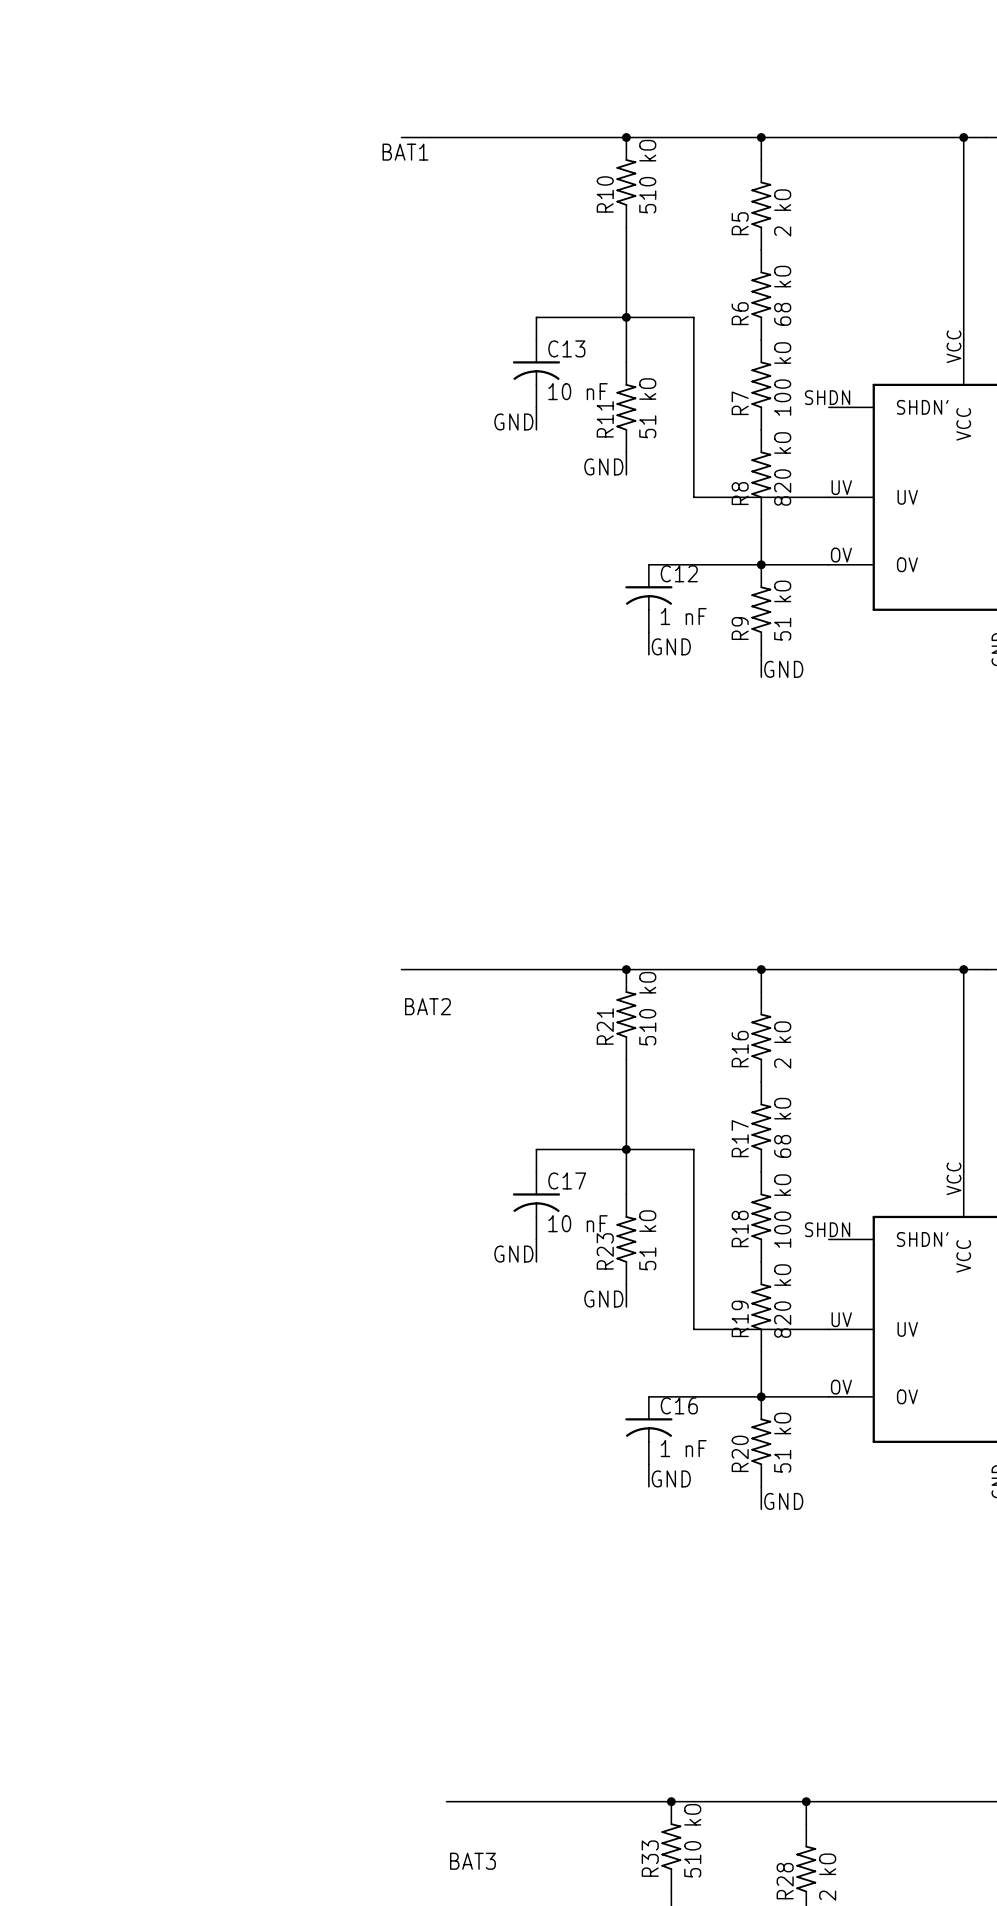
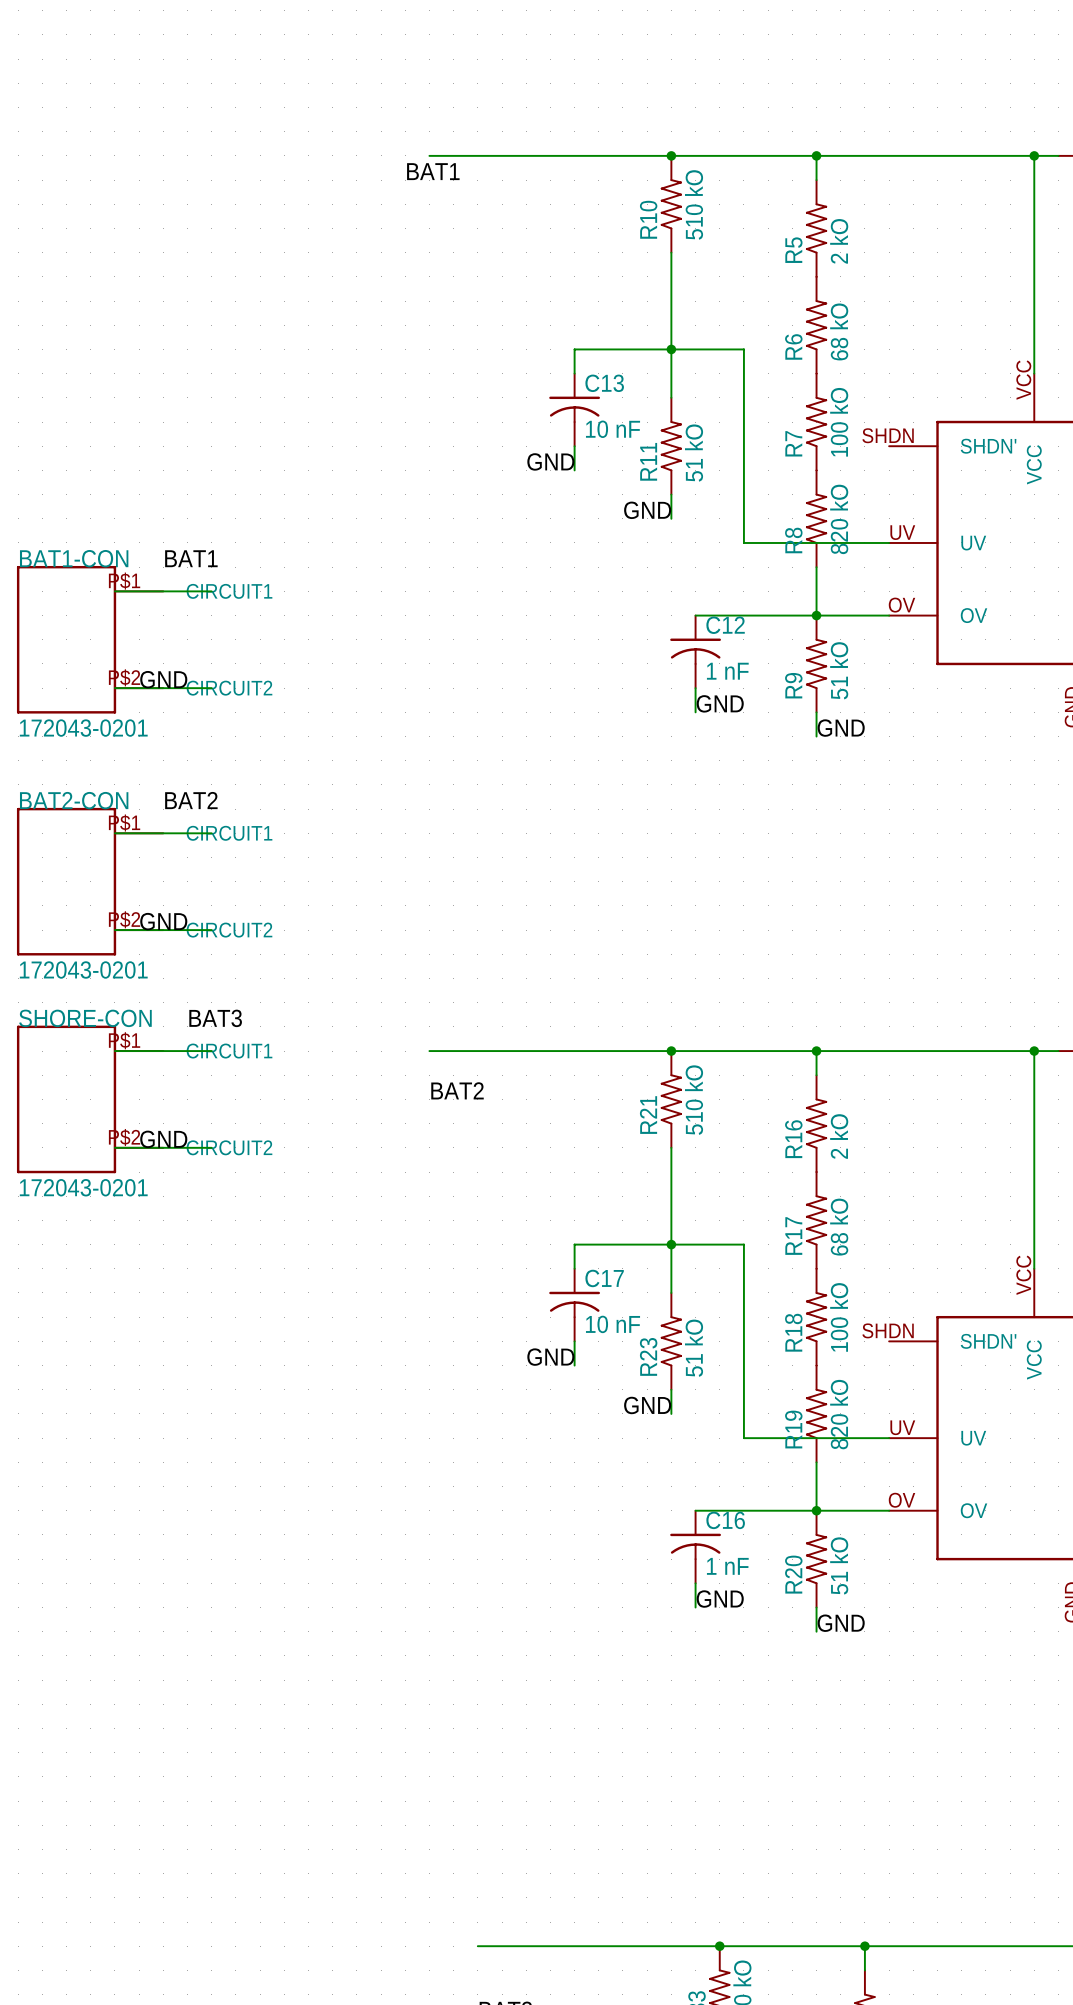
label: none -> BAT1 (191, 558)
wire: none -> (114, 591) (211, 591)
BAT1-CON: none -> 172043-0201 (90, 639)
label: none -> GND (163, 679)
wire: none -> (114, 688) (211, 688)
label: none -> BAT2 (191, 800)
wire: none -> (114, 833) (211, 833)
BAT2-CON: none -> 172043-0201 (90, 881)
label: none -> GND (163, 921)
wire: none -> (114, 930) (211, 930)
label: none -> BAT3 (215, 1018)
wire: none -> (114, 1051) (211, 1051)
SHORE-CON: none -> 172043-0201 (90, 1099)
label: none -> GND (163, 1139)
wire: none -> (114, 1147) (211, 1147)

